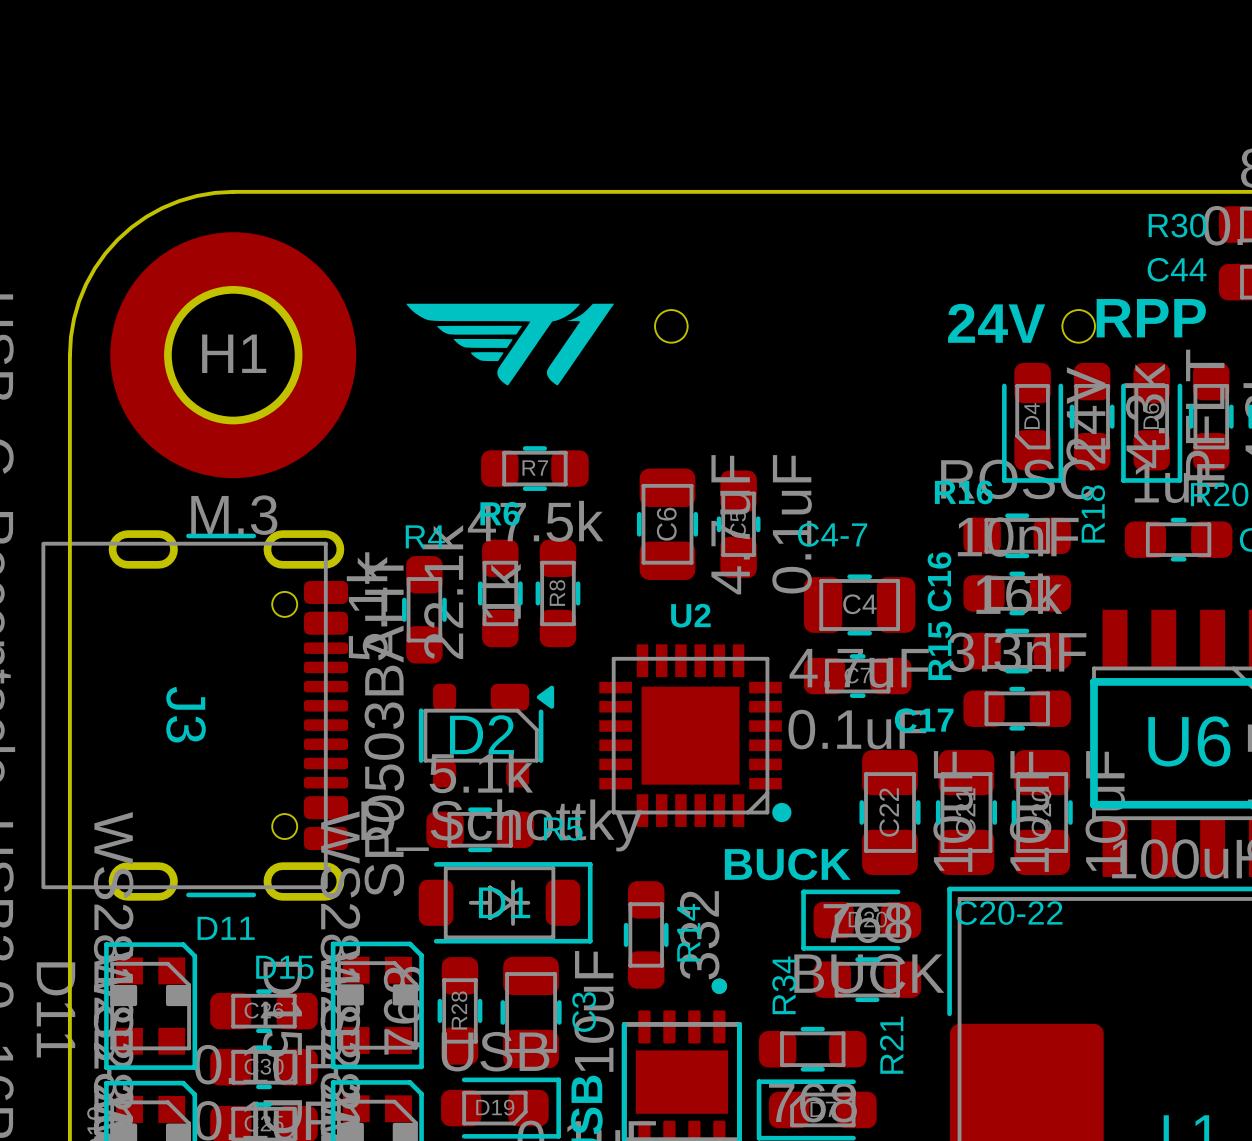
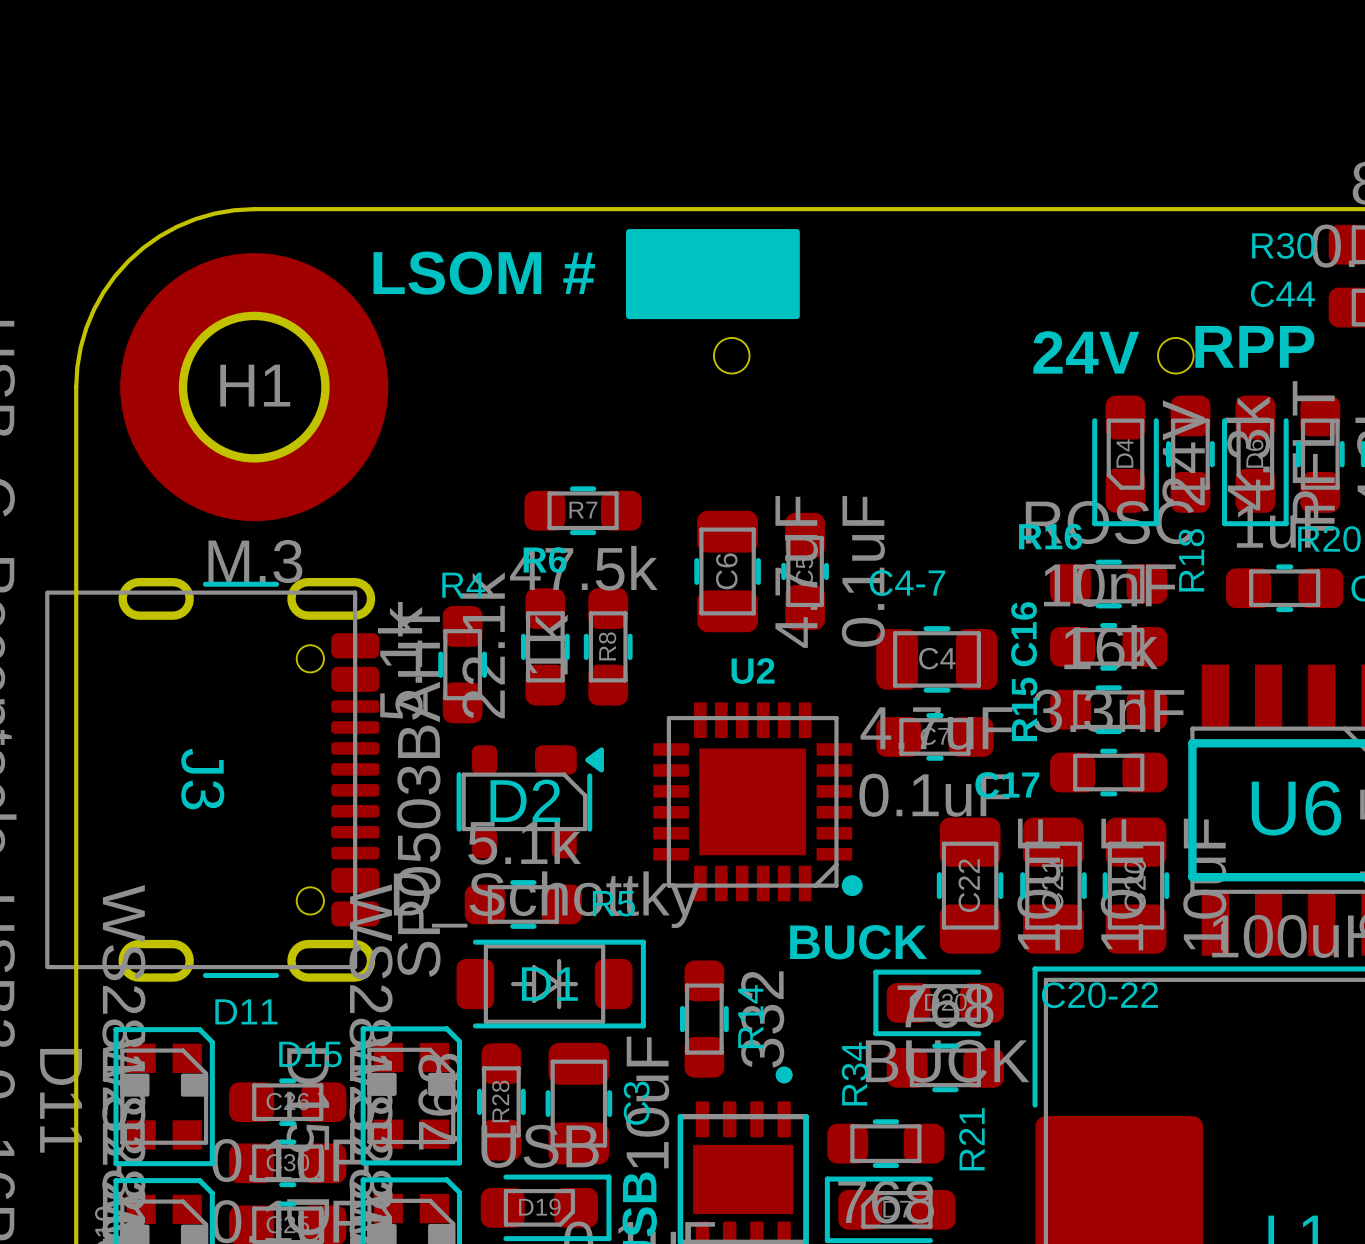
drawing: none -> [625, 229, 800, 320]
text: none -> LSOM # (484, 273)
drawing: [406, 303, 614, 386] -> none

